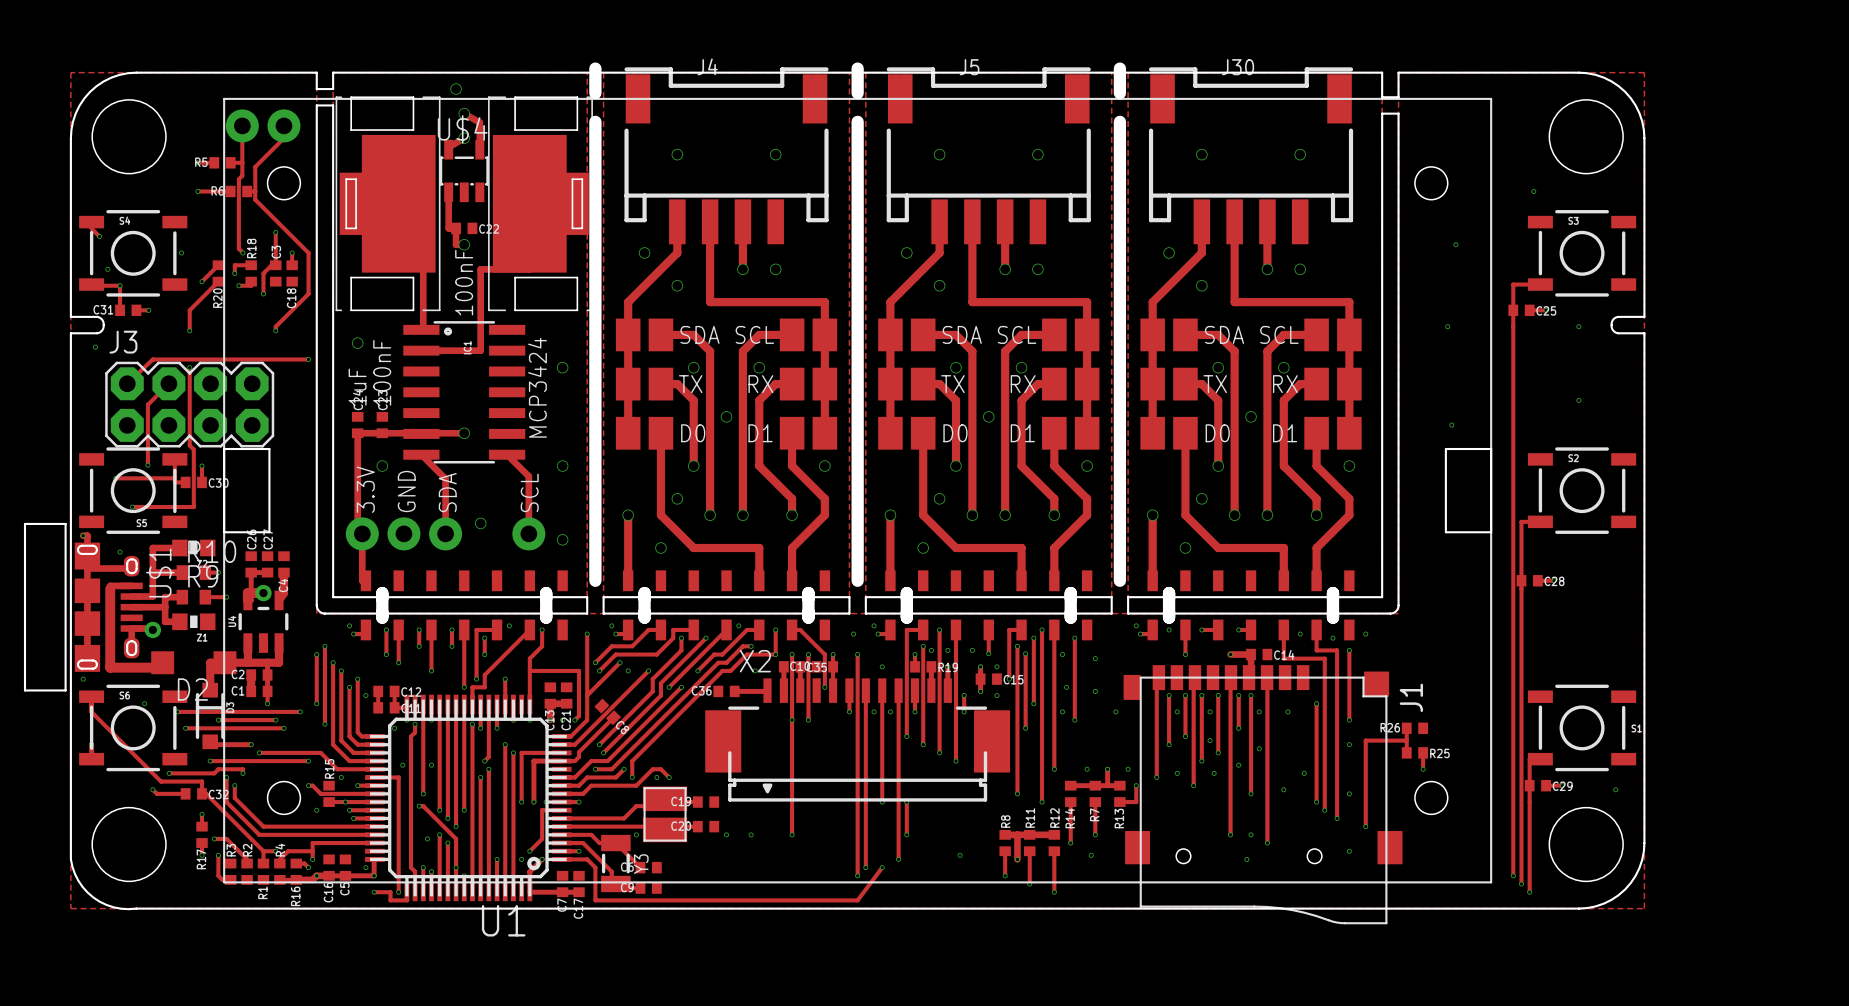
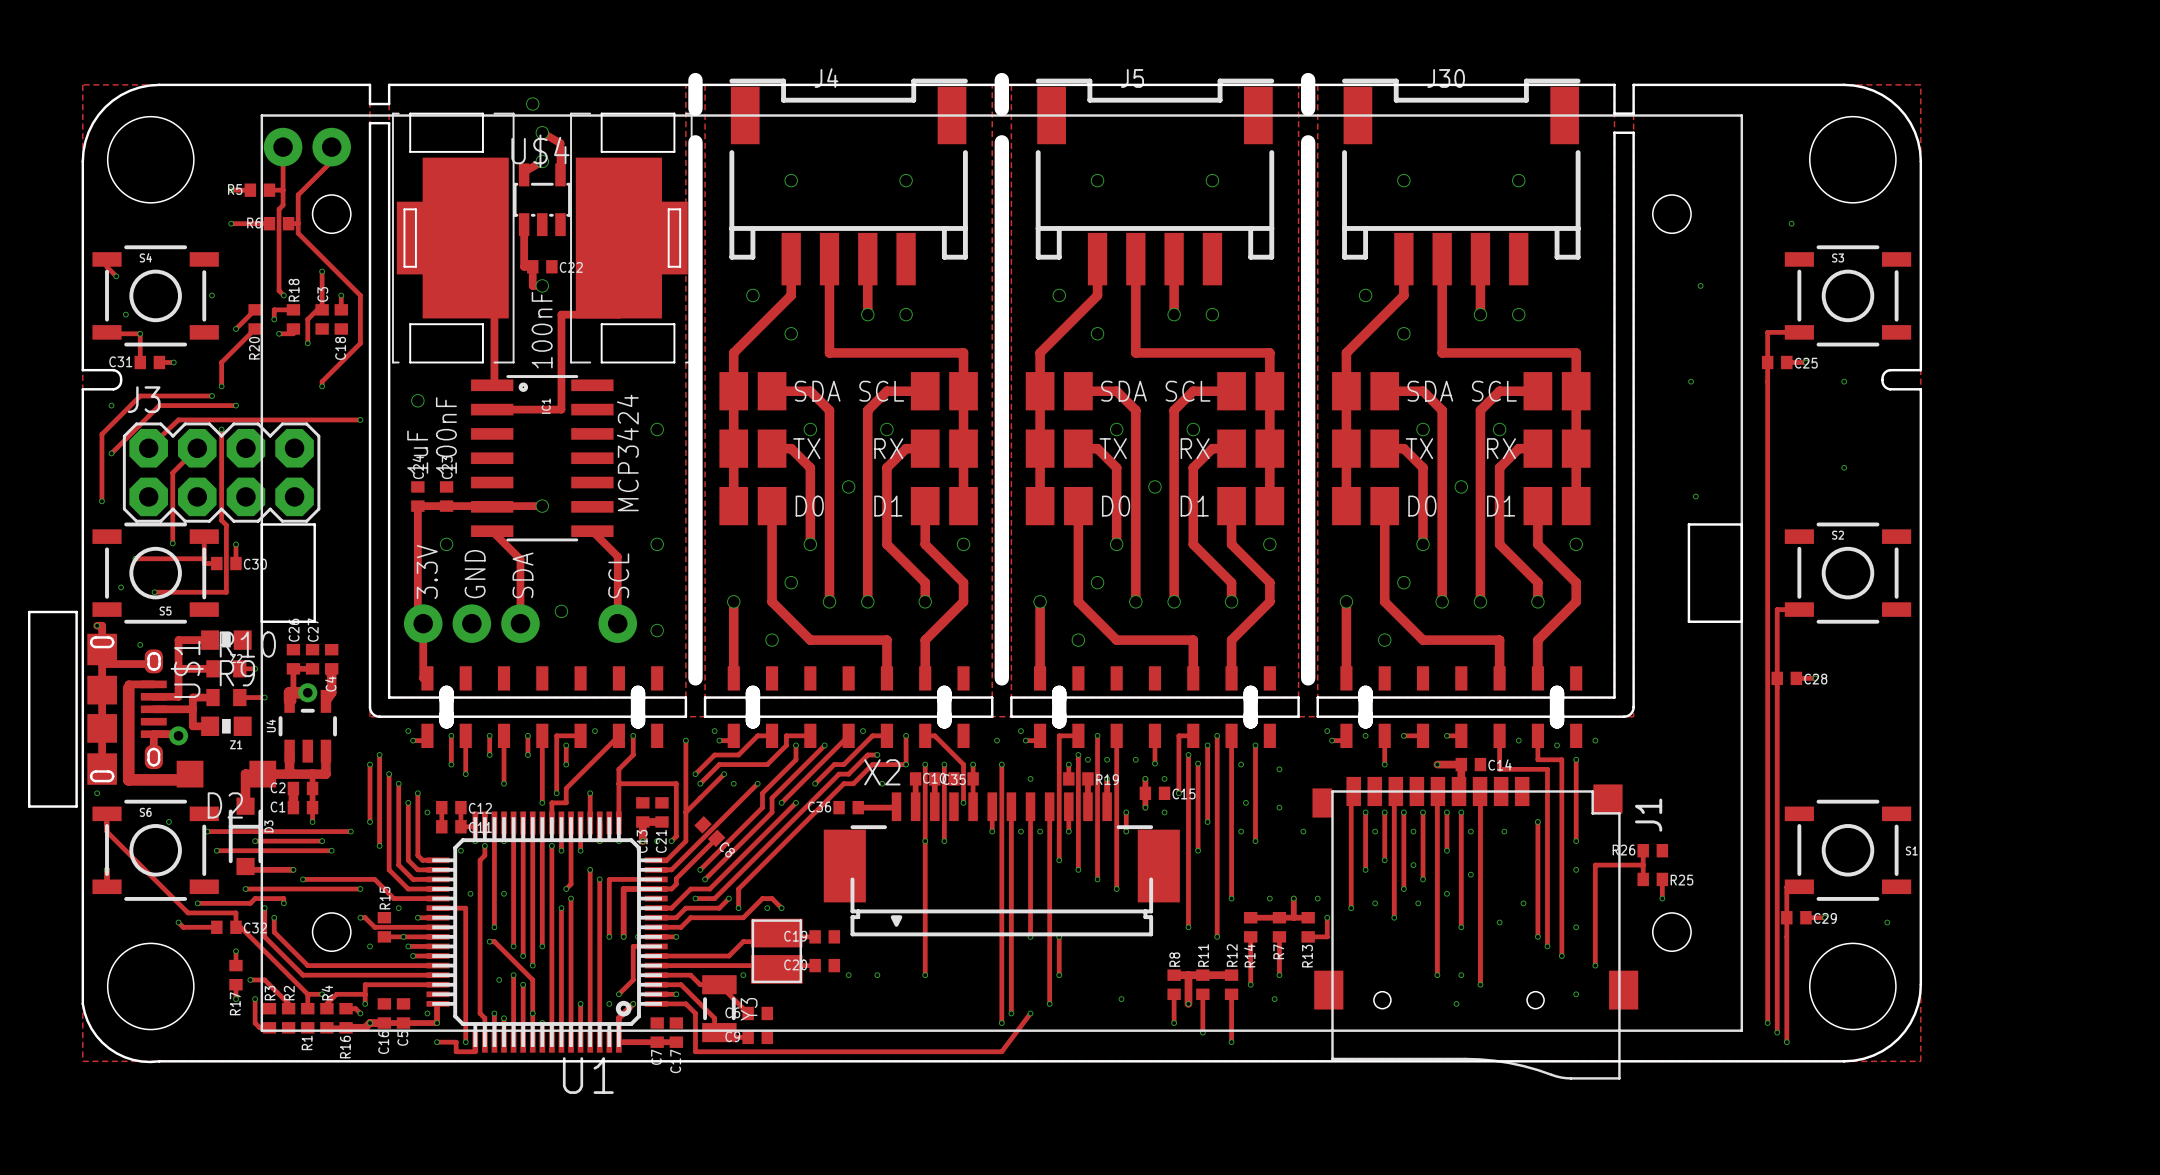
track: none -> (212, 396) (140, 396) (101, 434) (101, 501)
via: none -> (212, 396)
track: none -> (235, 405) (159, 405) (111, 453)
via: none -> (235, 405)
via: none -> (111, 453)
via: none -> (101, 501)
via: none -> (121, 587)

